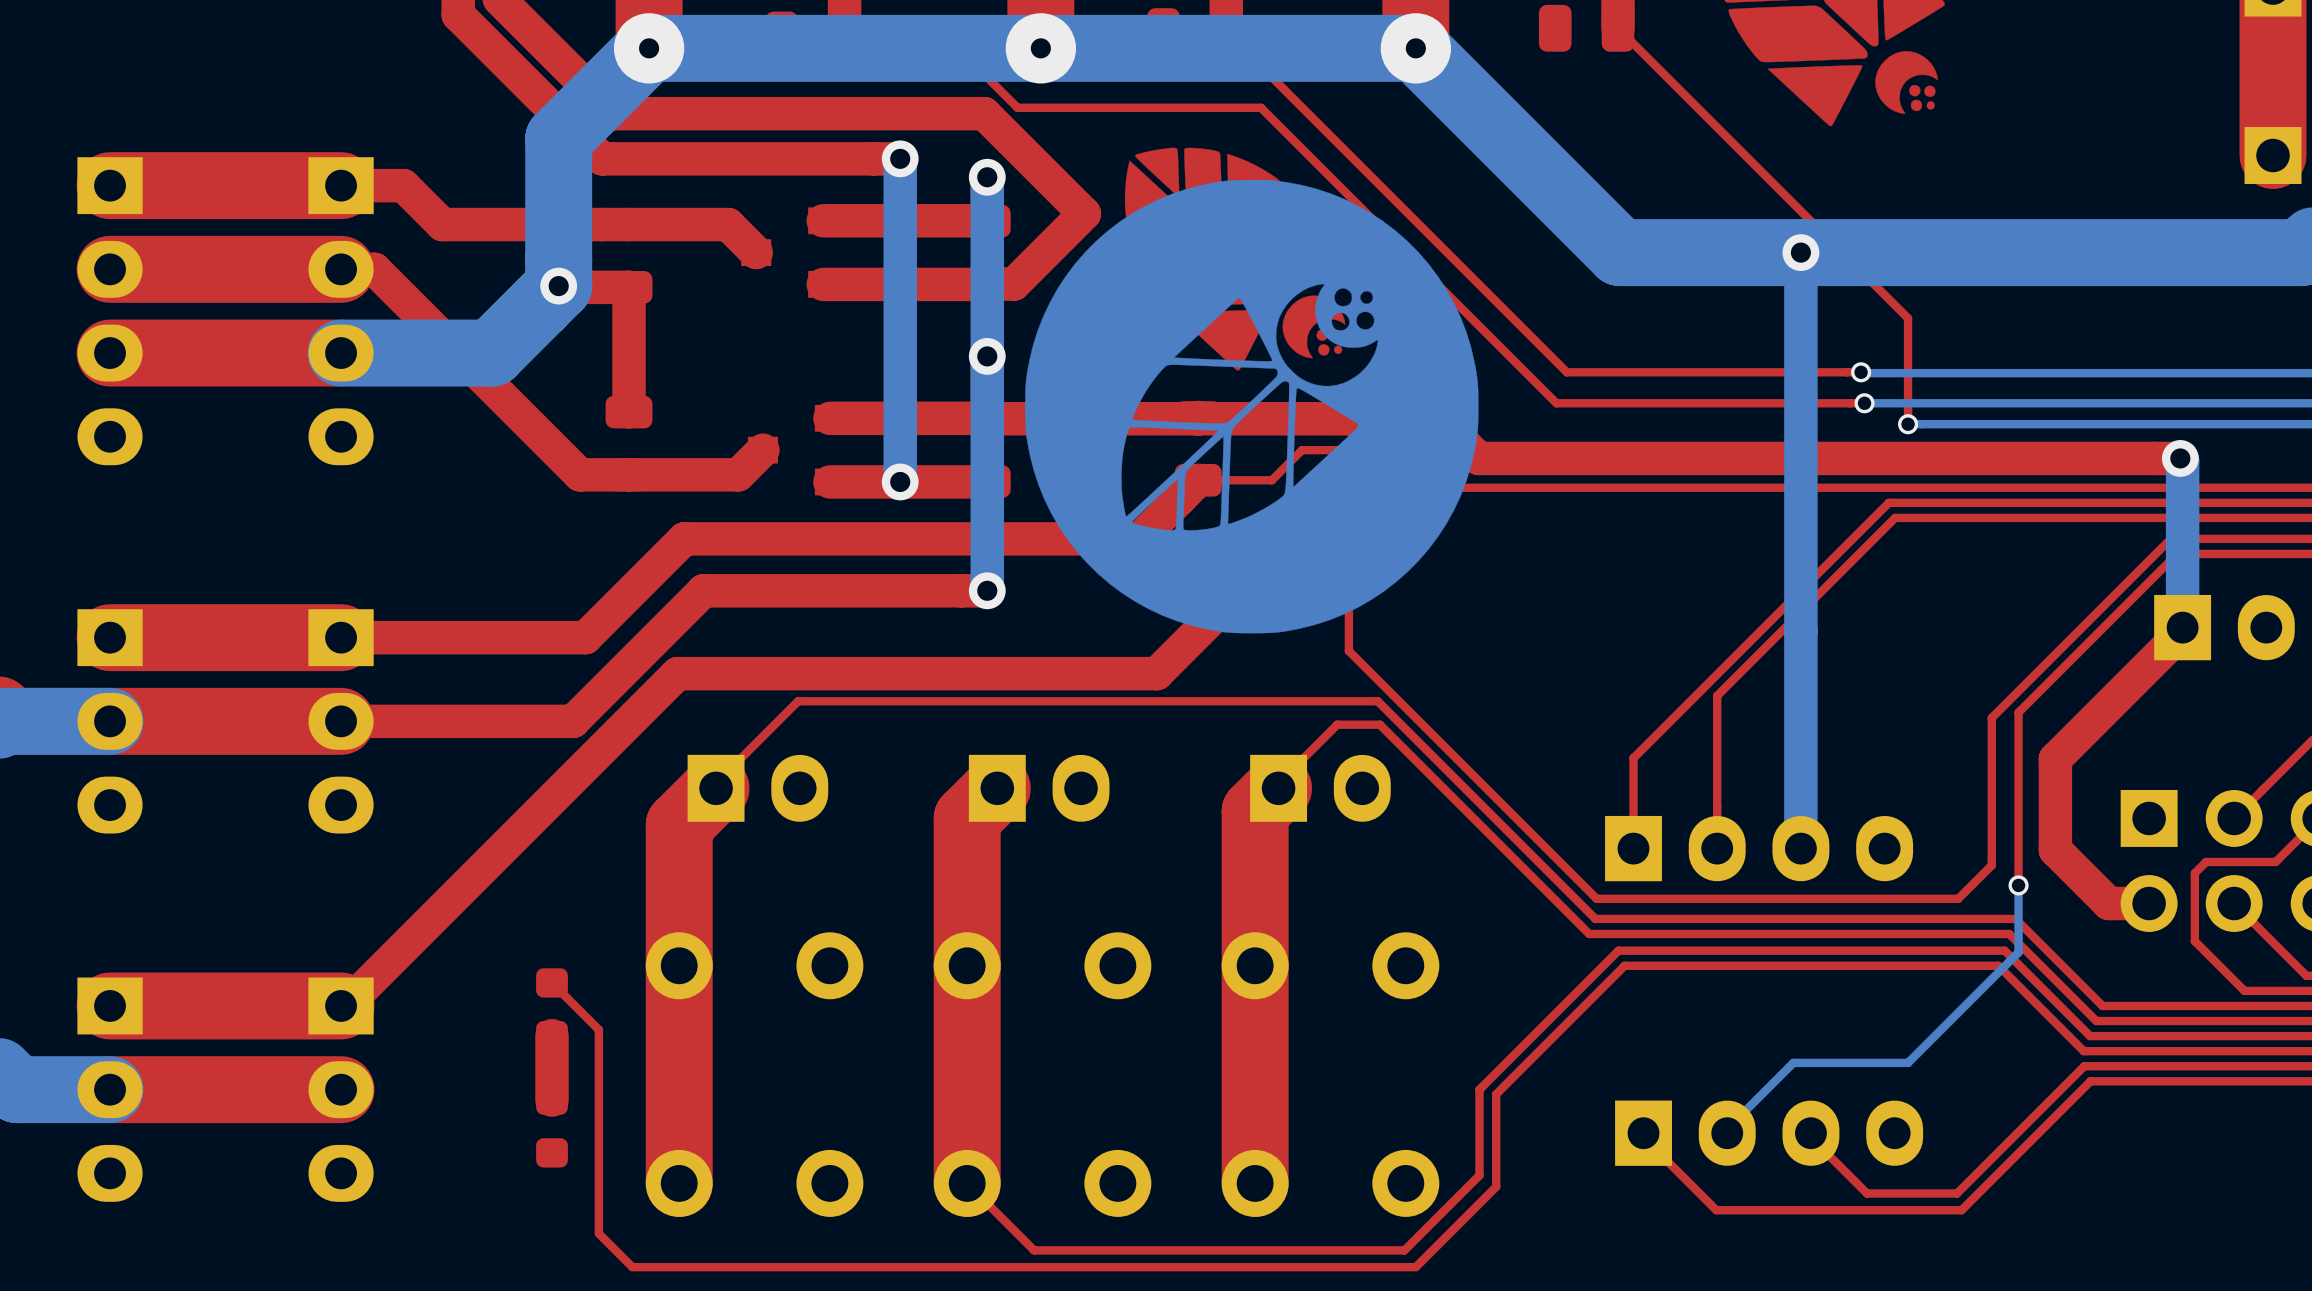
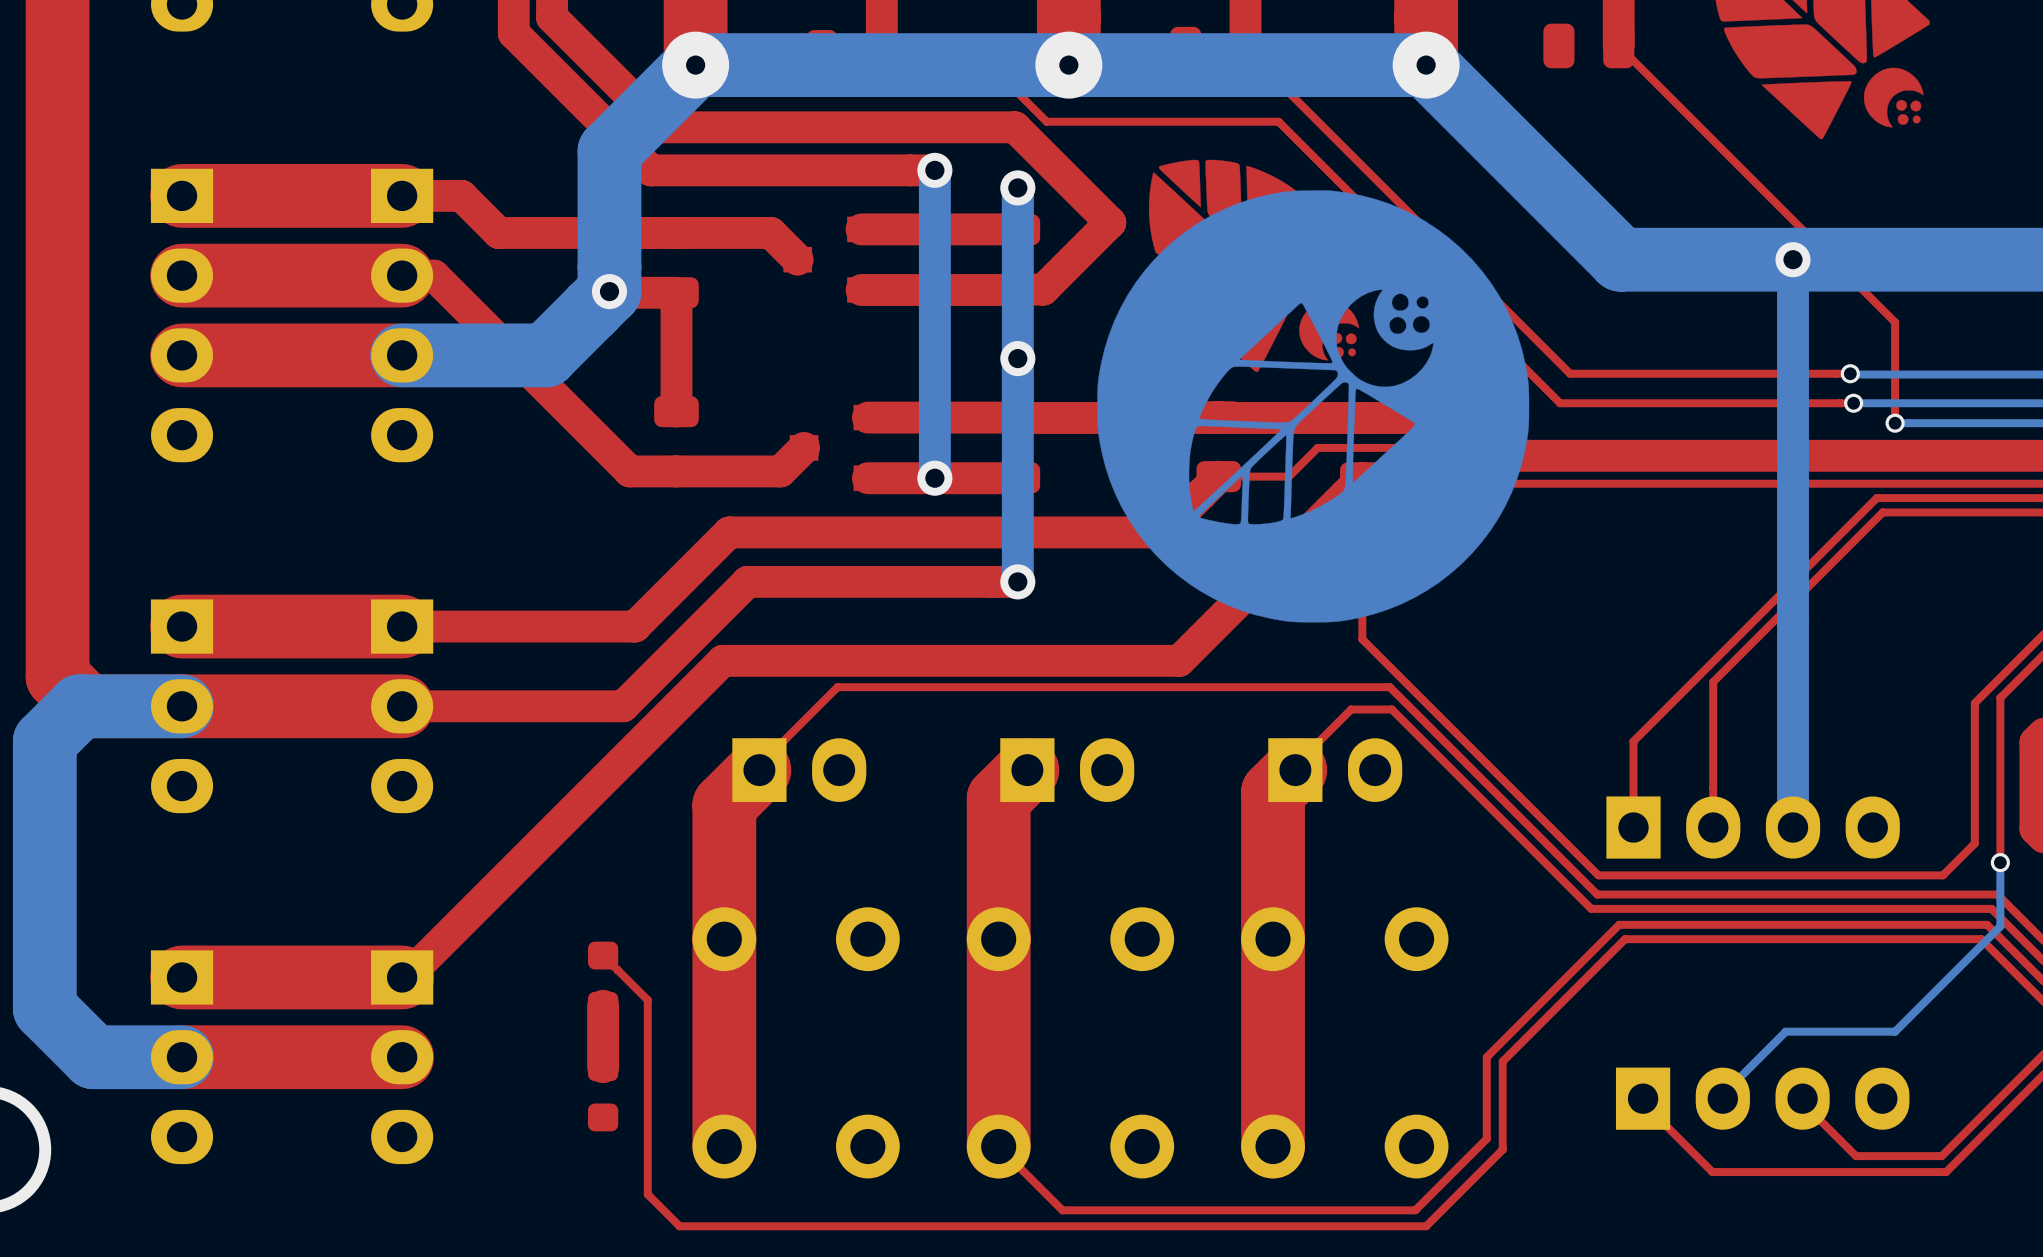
drawing position: (1251, 406) -> (1313, 406)

